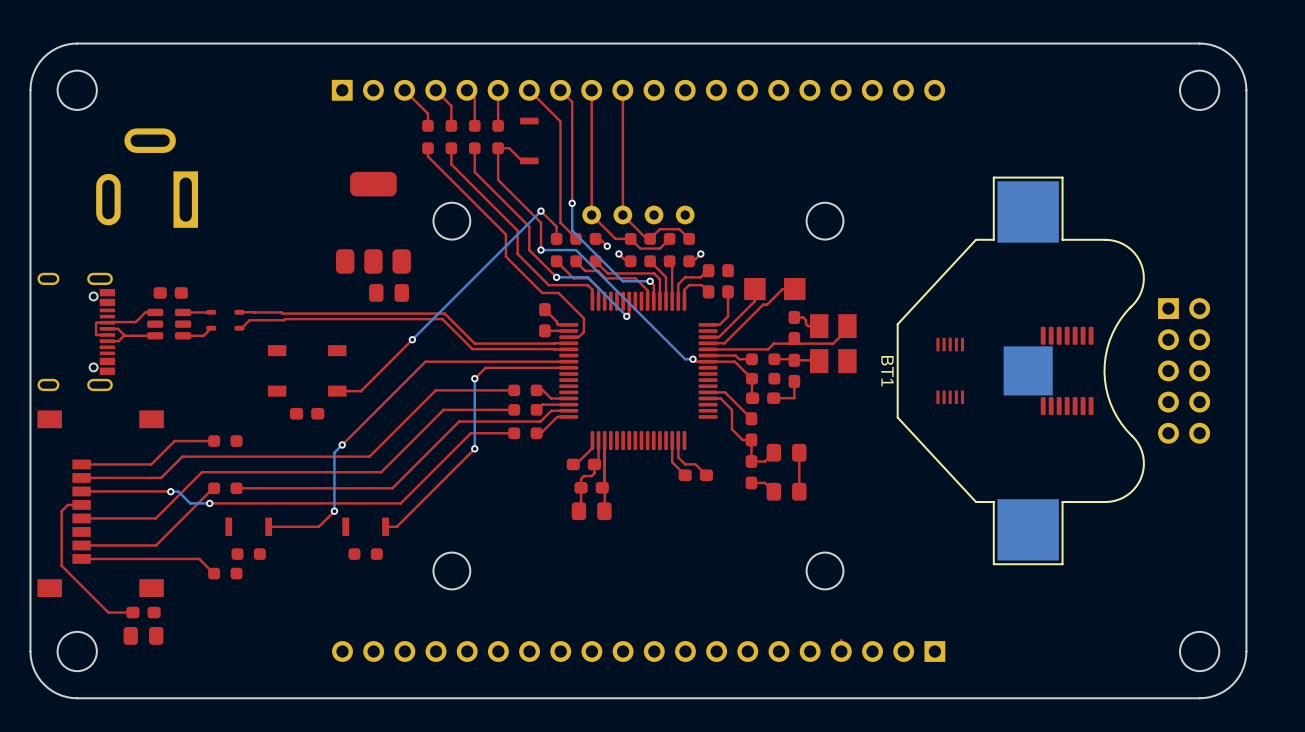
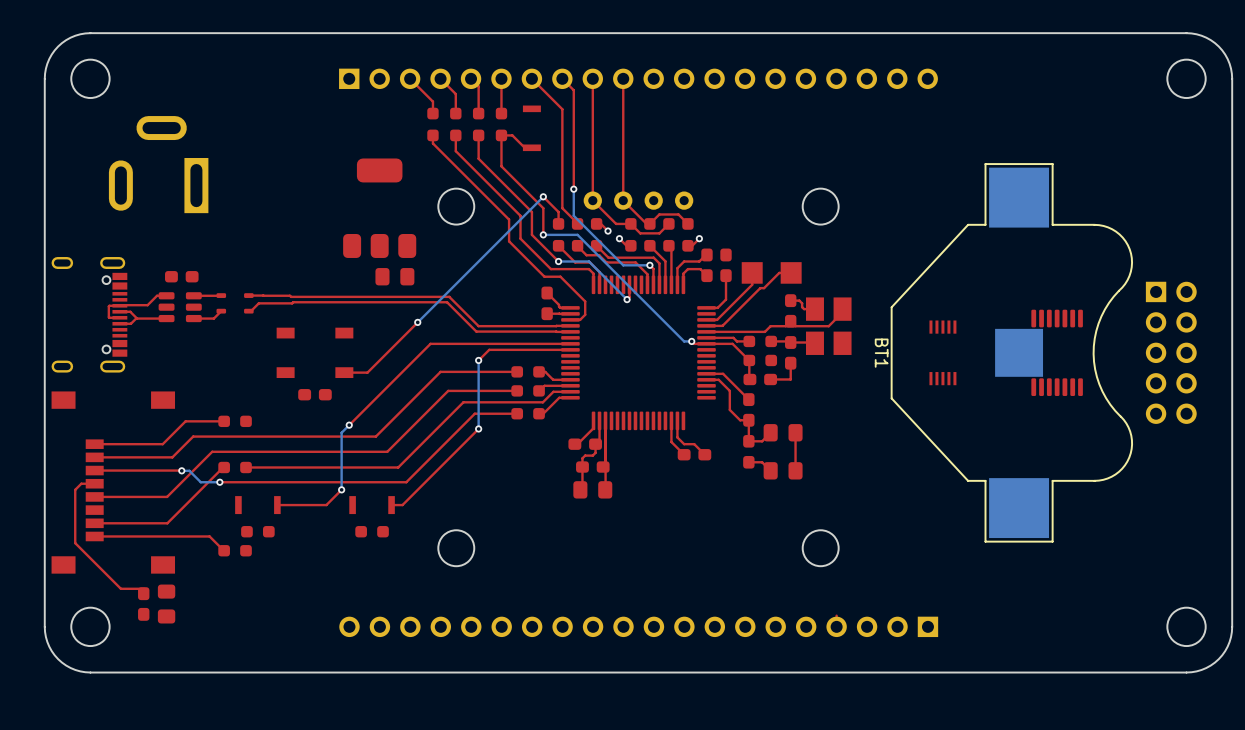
part rotation: 0° (143, 612) -> 90° clockwise (143, 604)
part rotation: 0° (143, 635) -> 90° clockwise (166, 604)

